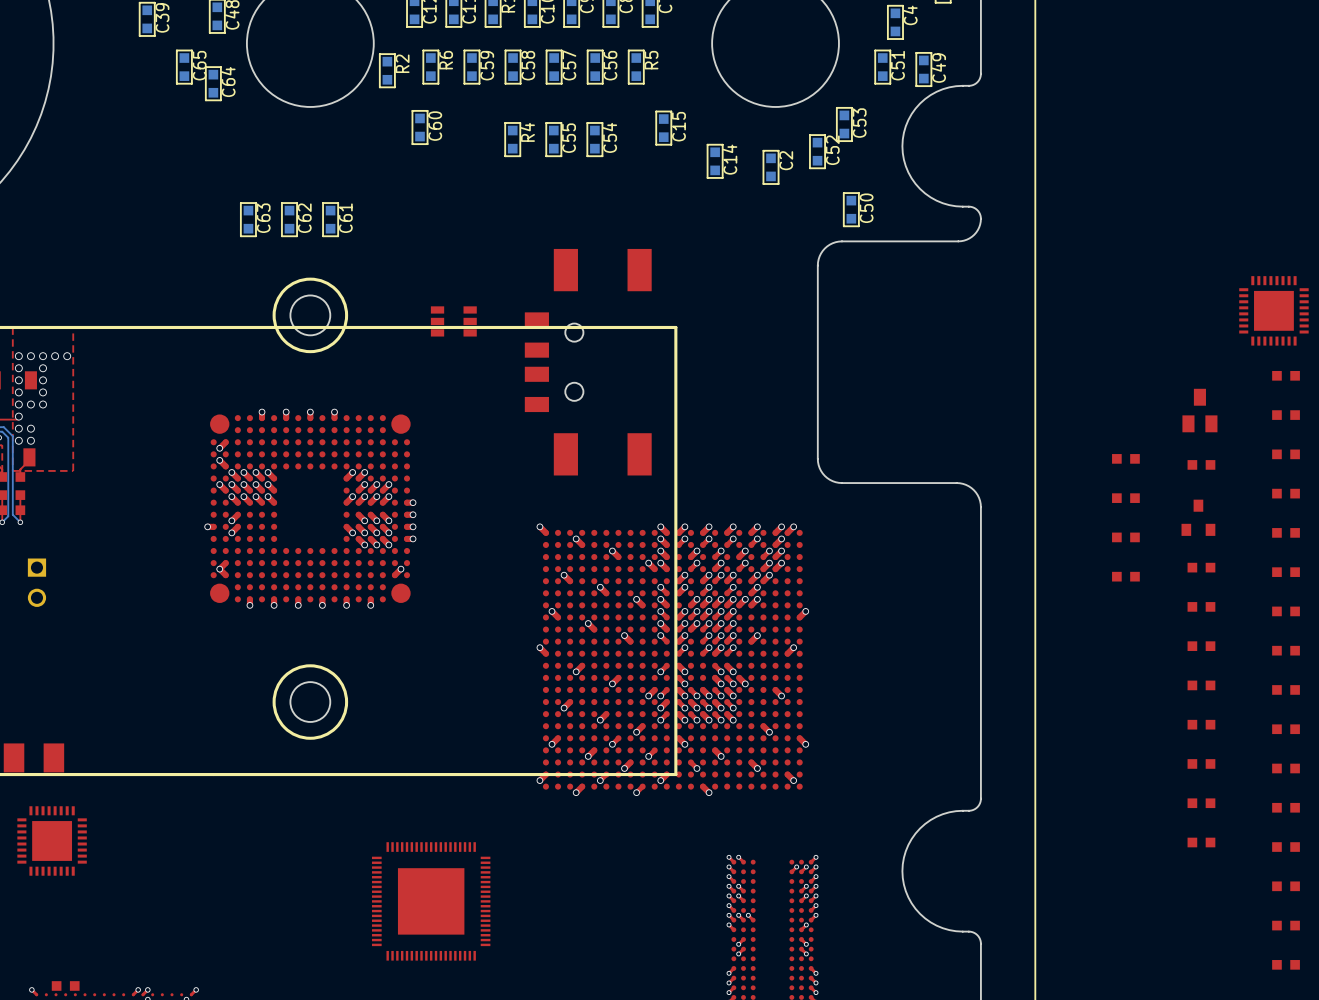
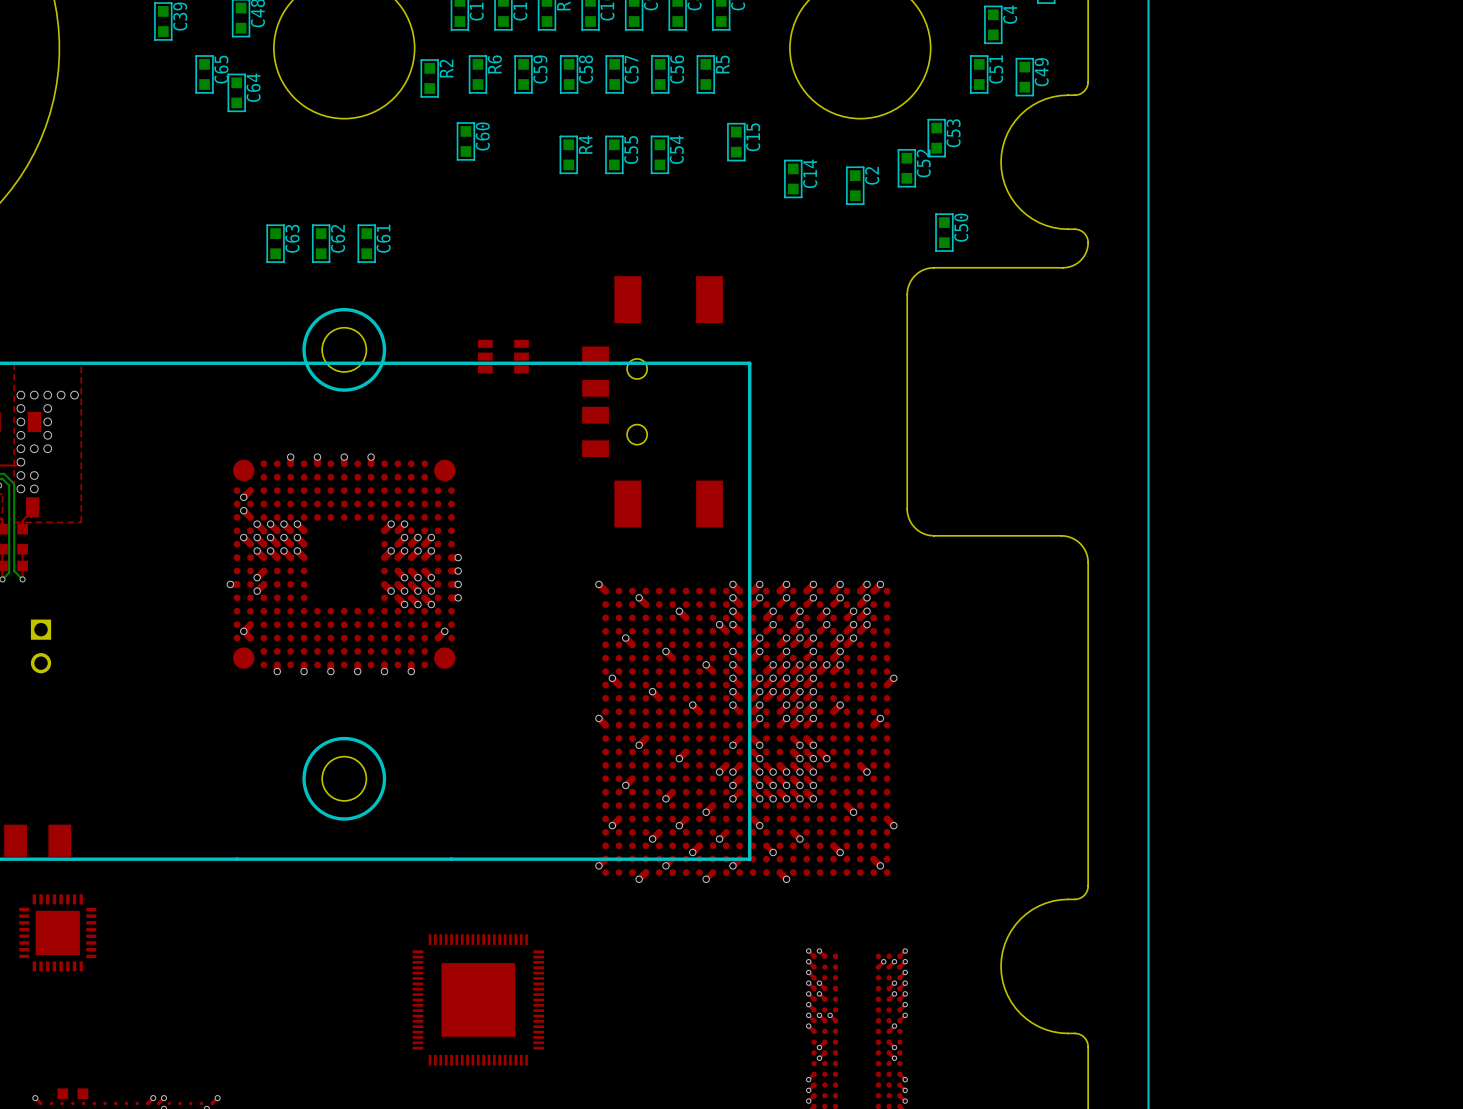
part: (1273, 310) -> none
part: (1286, 375) -> none
part: (1199, 410) -> none
part: (1286, 415) -> none
part: (1286, 454) -> none
part: (1125, 458) -> none
part: (1201, 464) -> none
part: (1286, 493) -> none
part: (1125, 498) -> none
part: (1198, 517) -> none
part: (1286, 532) -> none
part: (1125, 537) -> none
part: (1201, 567) -> none
part: (1286, 572) -> none
part: (1125, 576) -> none
part: (1201, 606) -> none
part: (1286, 611) -> none
part: (1201, 646) -> none
part: (1286, 650) -> none
part: (1201, 685) -> none
part: (1286, 689) -> none
part: (1201, 724) -> none
part: (1286, 729) -> none
part: (1201, 763) -> none
part: (1286, 768) -> none
part: (1201, 803) -> none
part: (1286, 807) -> none
part: (1201, 842) -> none
part: (1286, 847) -> none
part: (1286, 886) -> none
part: (1286, 925) -> none
part: (1286, 964) -> none

